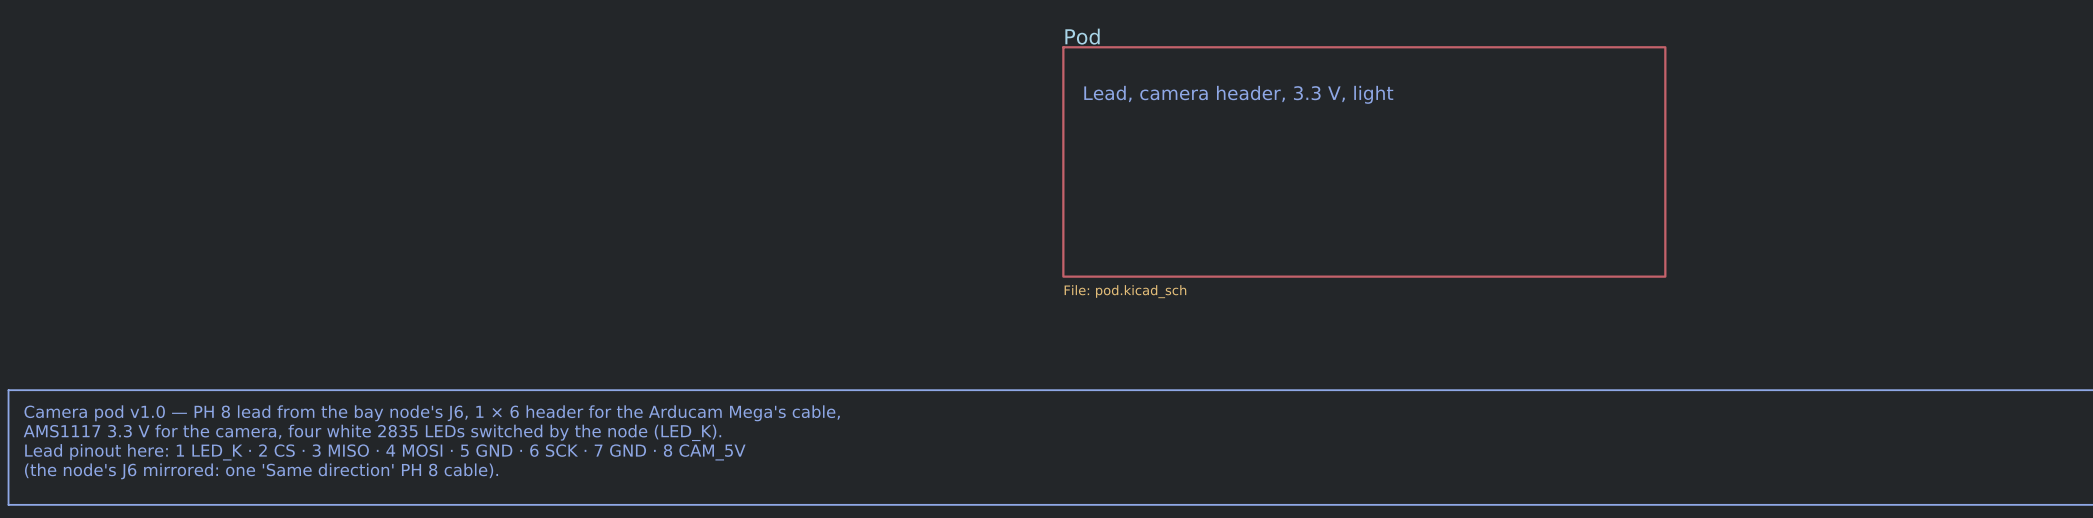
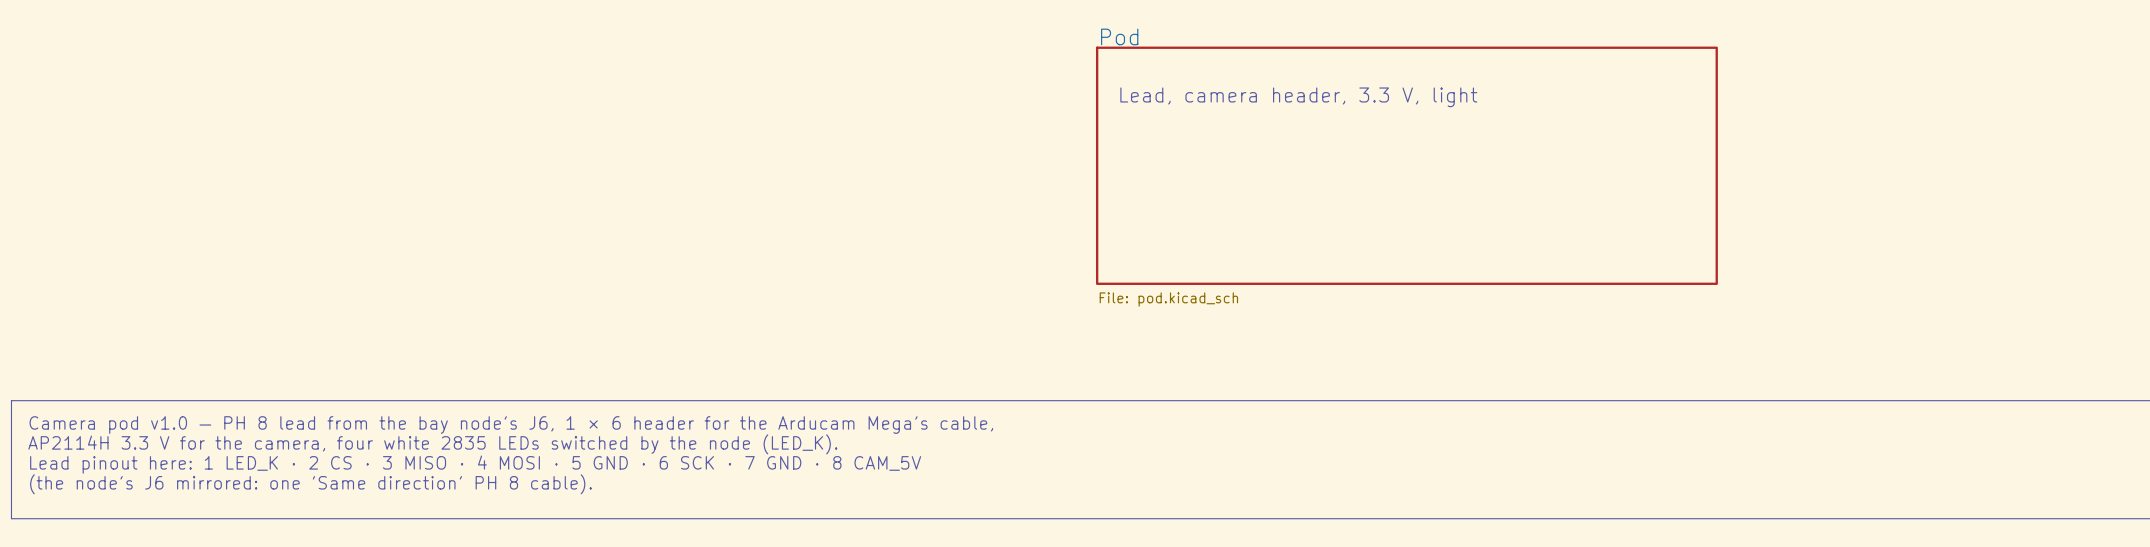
text: AMS1117 3.3 V for the camera, four white 2835 LEDs switched by the node (LED_K). (372, 432) -> AP2114H 3.3 V for the camera, four white 2835 LEDs switched by the node (LED_K). (432, 444)

